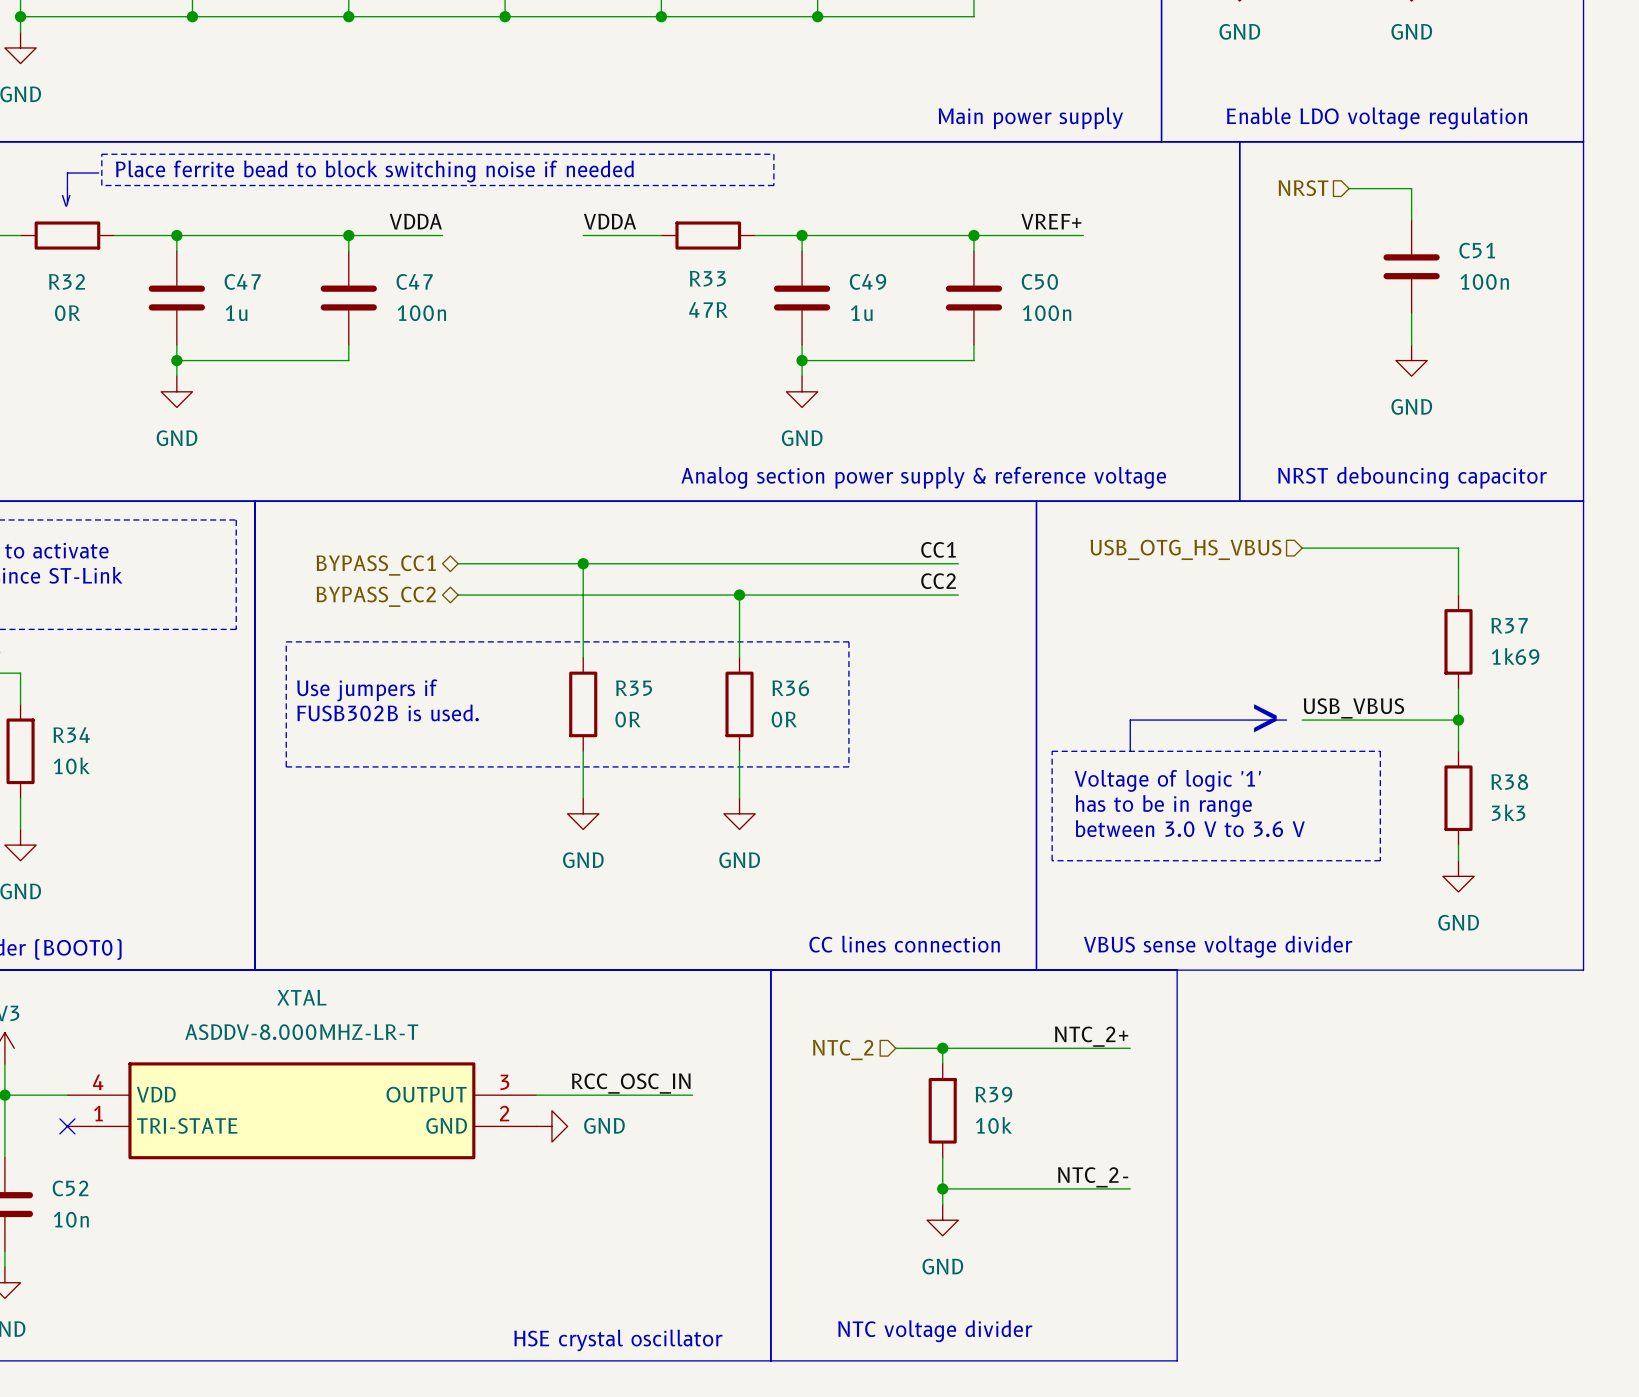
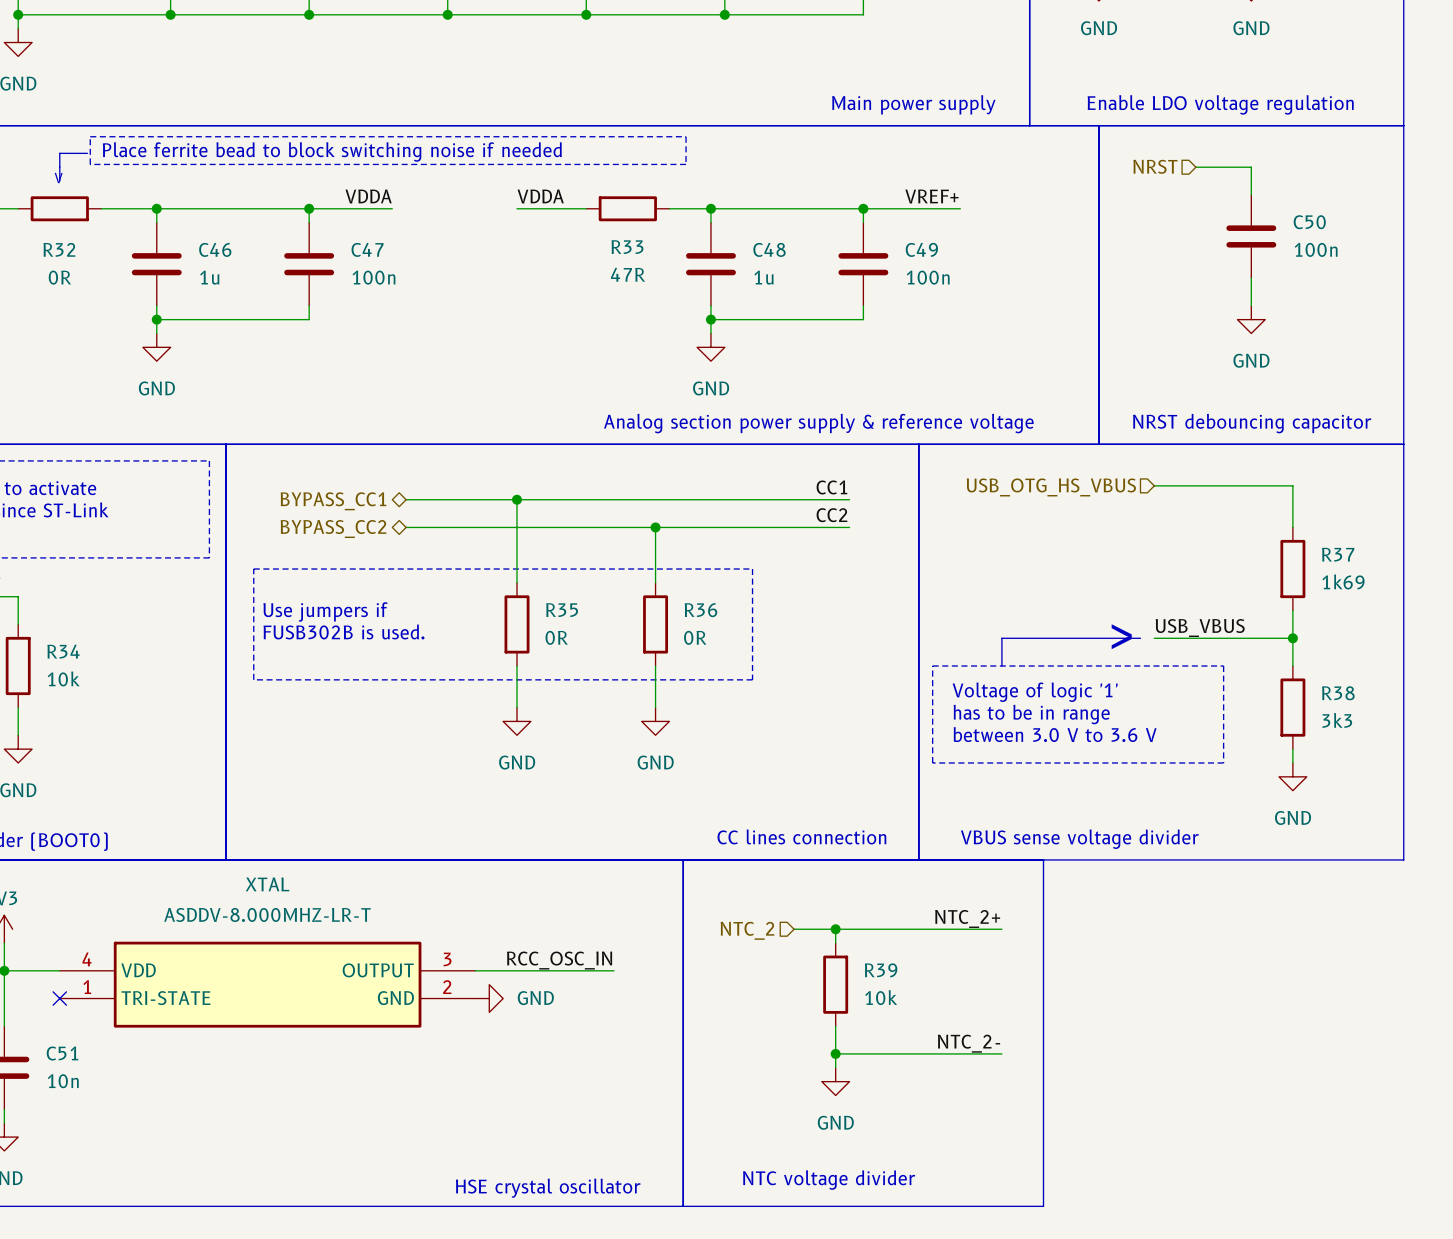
C51 name: C51 (1477, 250) -> C50 (1309, 222)
C47 name: C47 (242, 281) -> C46 (215, 249)
C49 name: C49 (868, 281) -> C48 (769, 249)
C50 name: C50 (1039, 281) -> C49 (921, 249)
C52 name: C52 (70, 1188) -> C51 (62, 1053)

